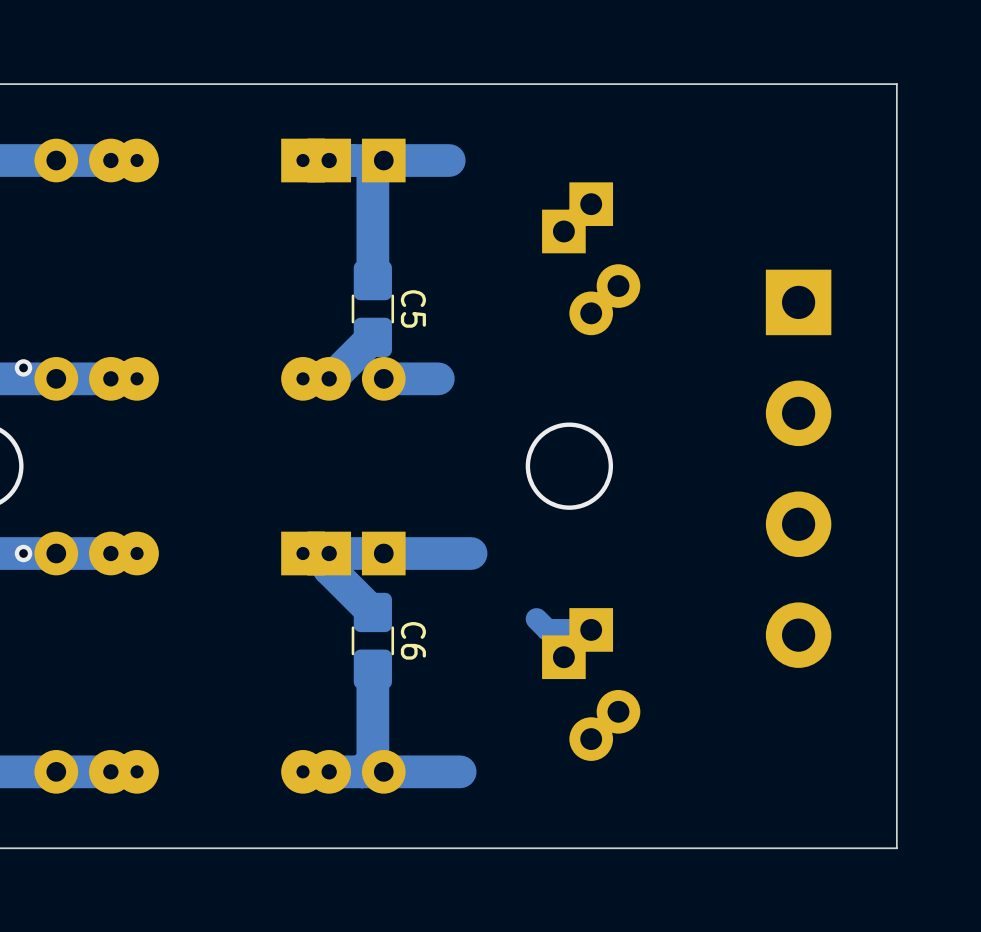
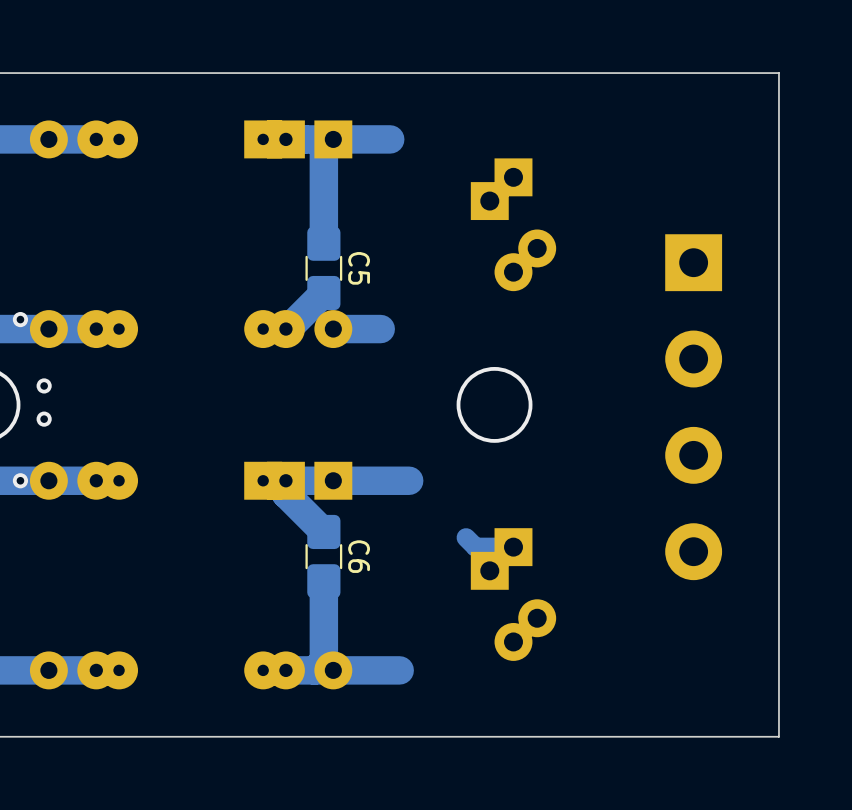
via: none -> (44, 385)
via: none -> (44, 419)

